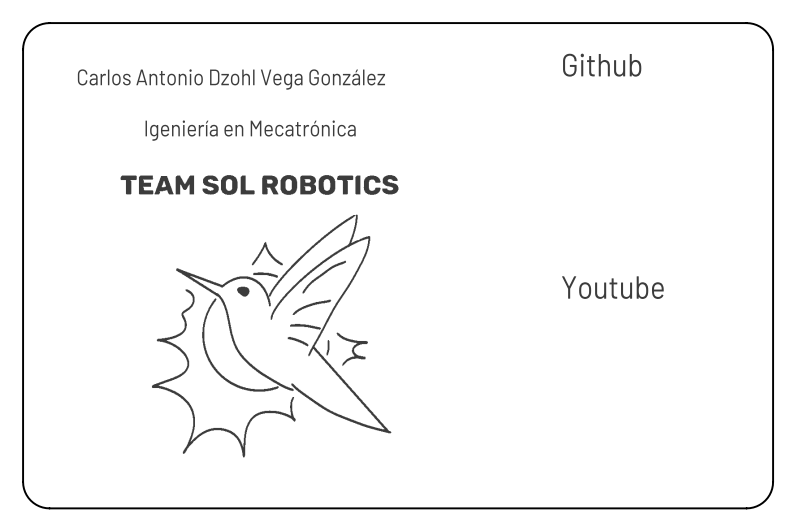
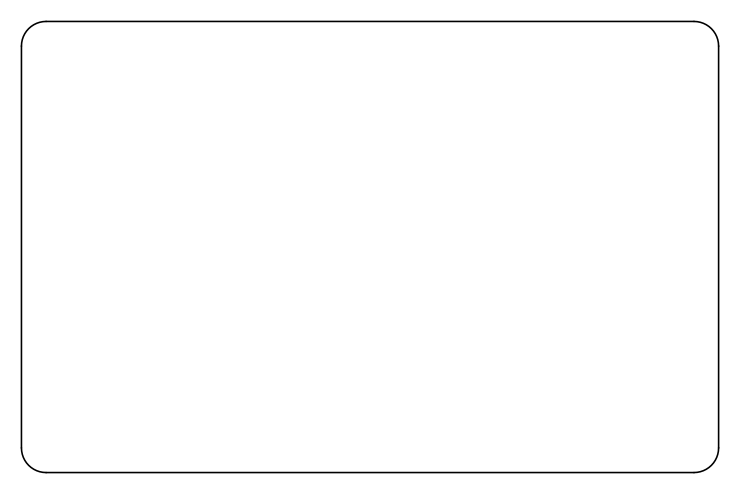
text: Github (602, 65) -> none
text: Carlos Antonio Dzohl Vega González (231, 79) -> none
text: Igeniería en Mecatrónica (250, 130) -> none
drawing: [120, 175, 399, 195] -> none
drawing: [151, 214, 392, 458] -> none
text: Youtube (612, 287) -> none

